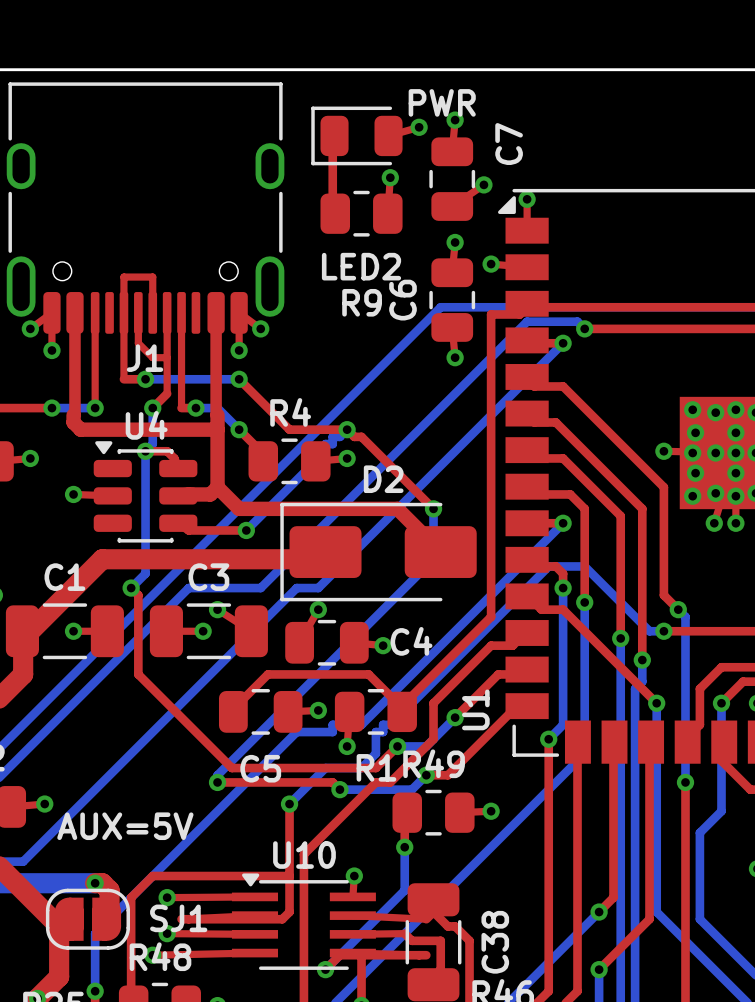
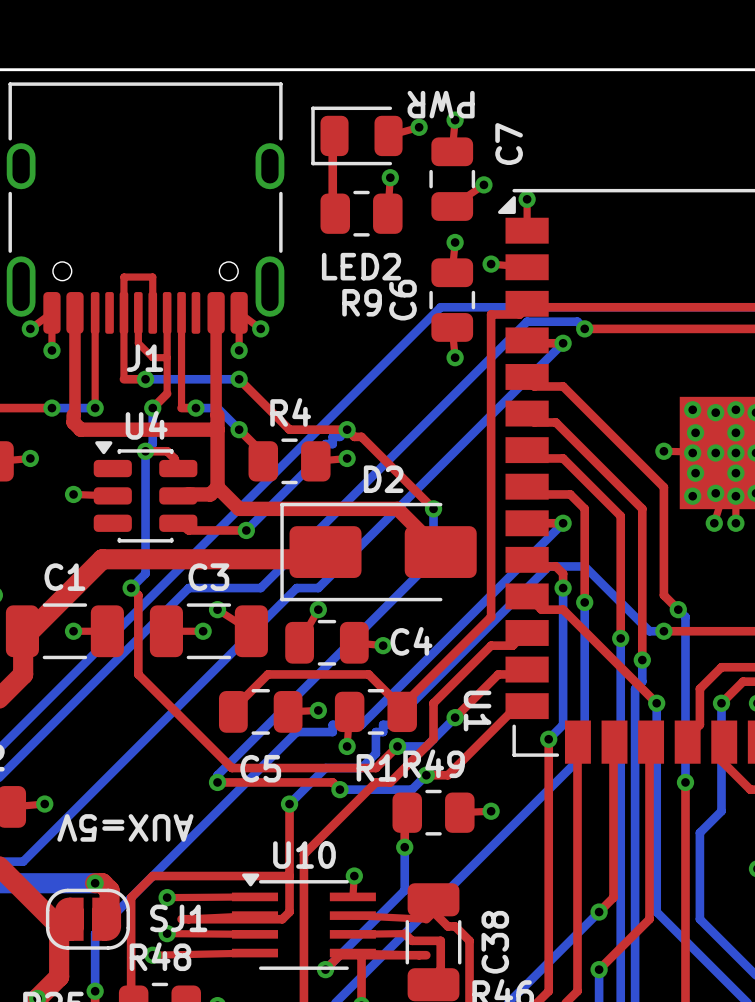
text rotation: 0° (442, 102) -> 180° (441, 104)
U1 name rotation: 0° (475, 709) -> 180° (477, 711)
text rotation: 0° (125, 826) -> 180° (125, 827)

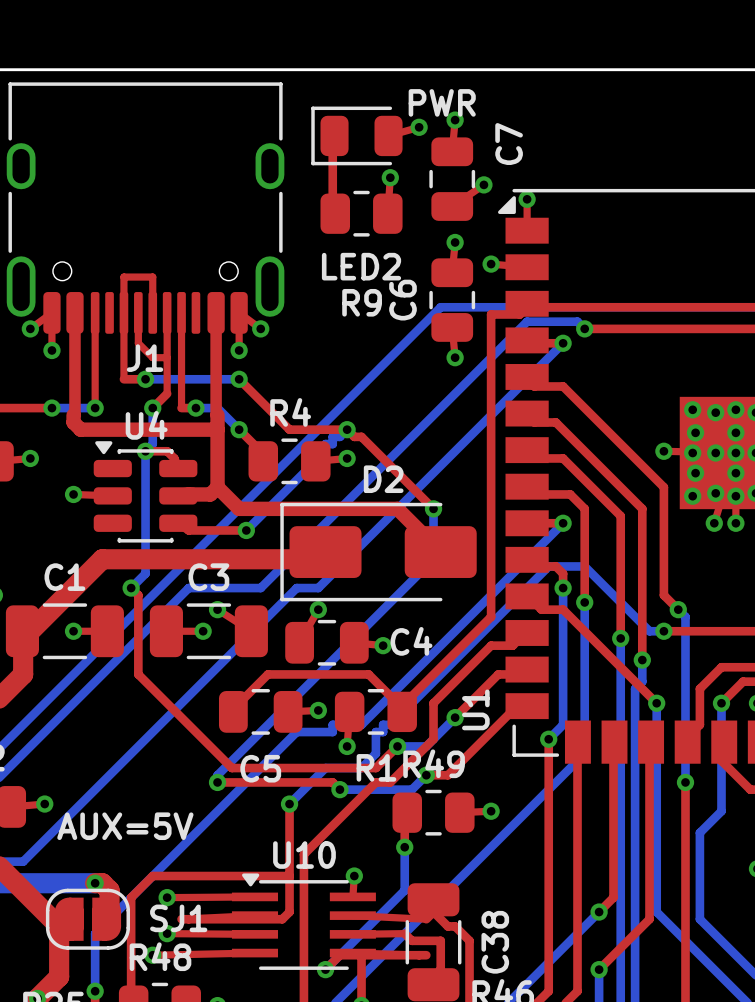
text rotation: 0° (441, 104) -> 180° (442, 102)
U1 name rotation: 0° (477, 711) -> 180° (475, 709)
text rotation: 0° (125, 827) -> 180° (125, 826)

